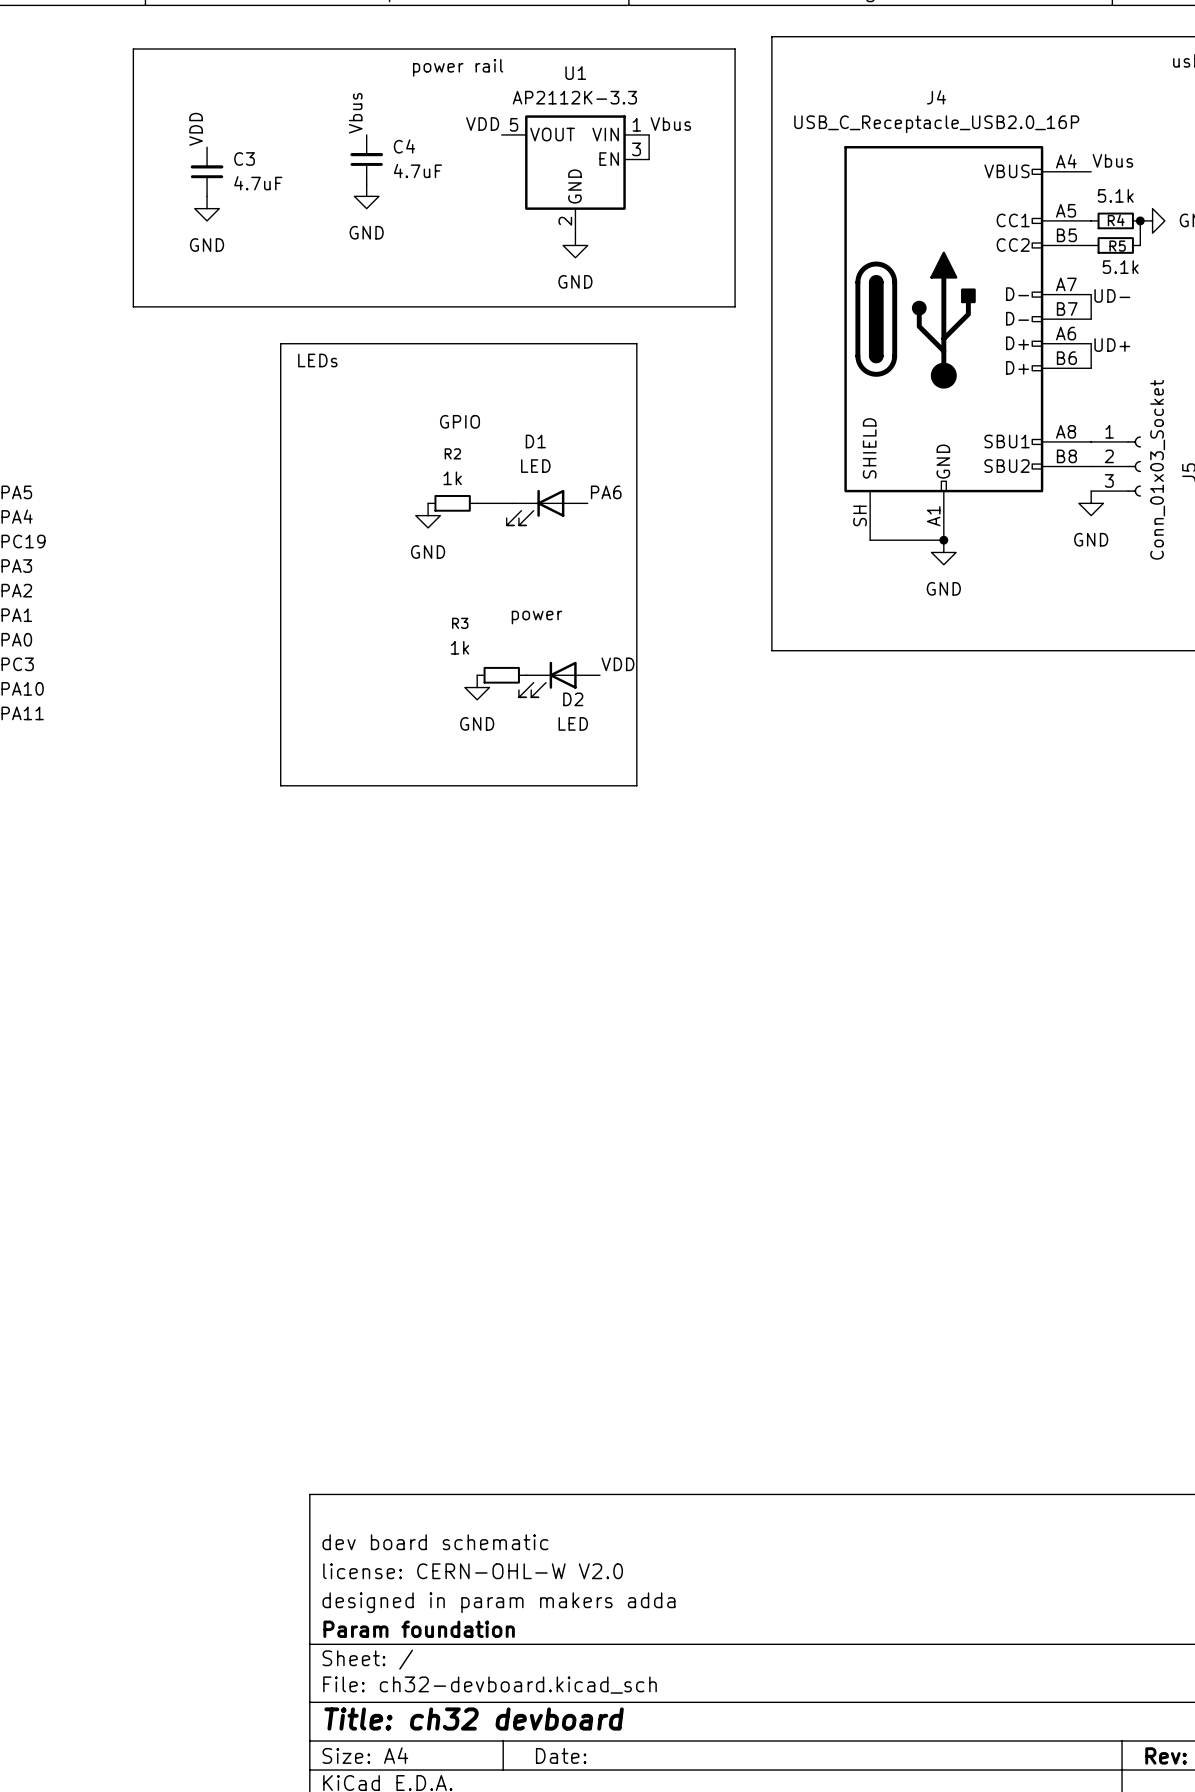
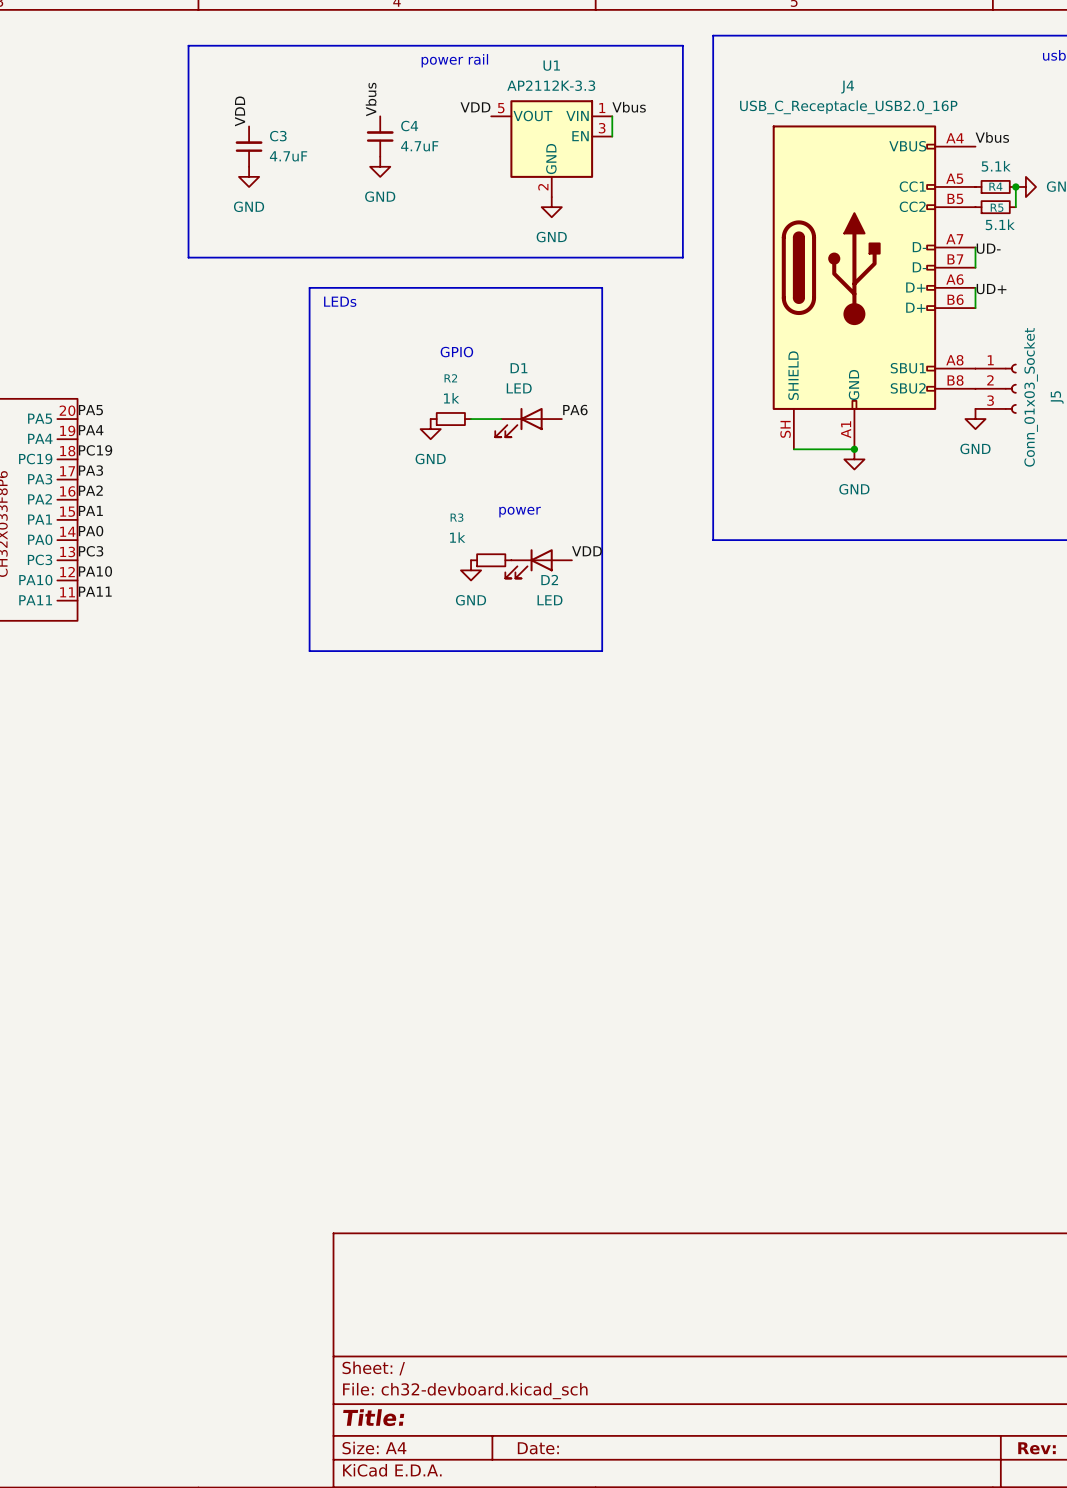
title block: dev board schematic (435, 1542) -> none
title block: license: CERN-OHL-W V2.0 (473, 1571) -> none
title block: designed in param makers adda (498, 1602) -> none
title block: Param foundation (419, 1629) -> none
title block: Title: ch32 devboard (474, 1719) -> Title: (373, 1417)

